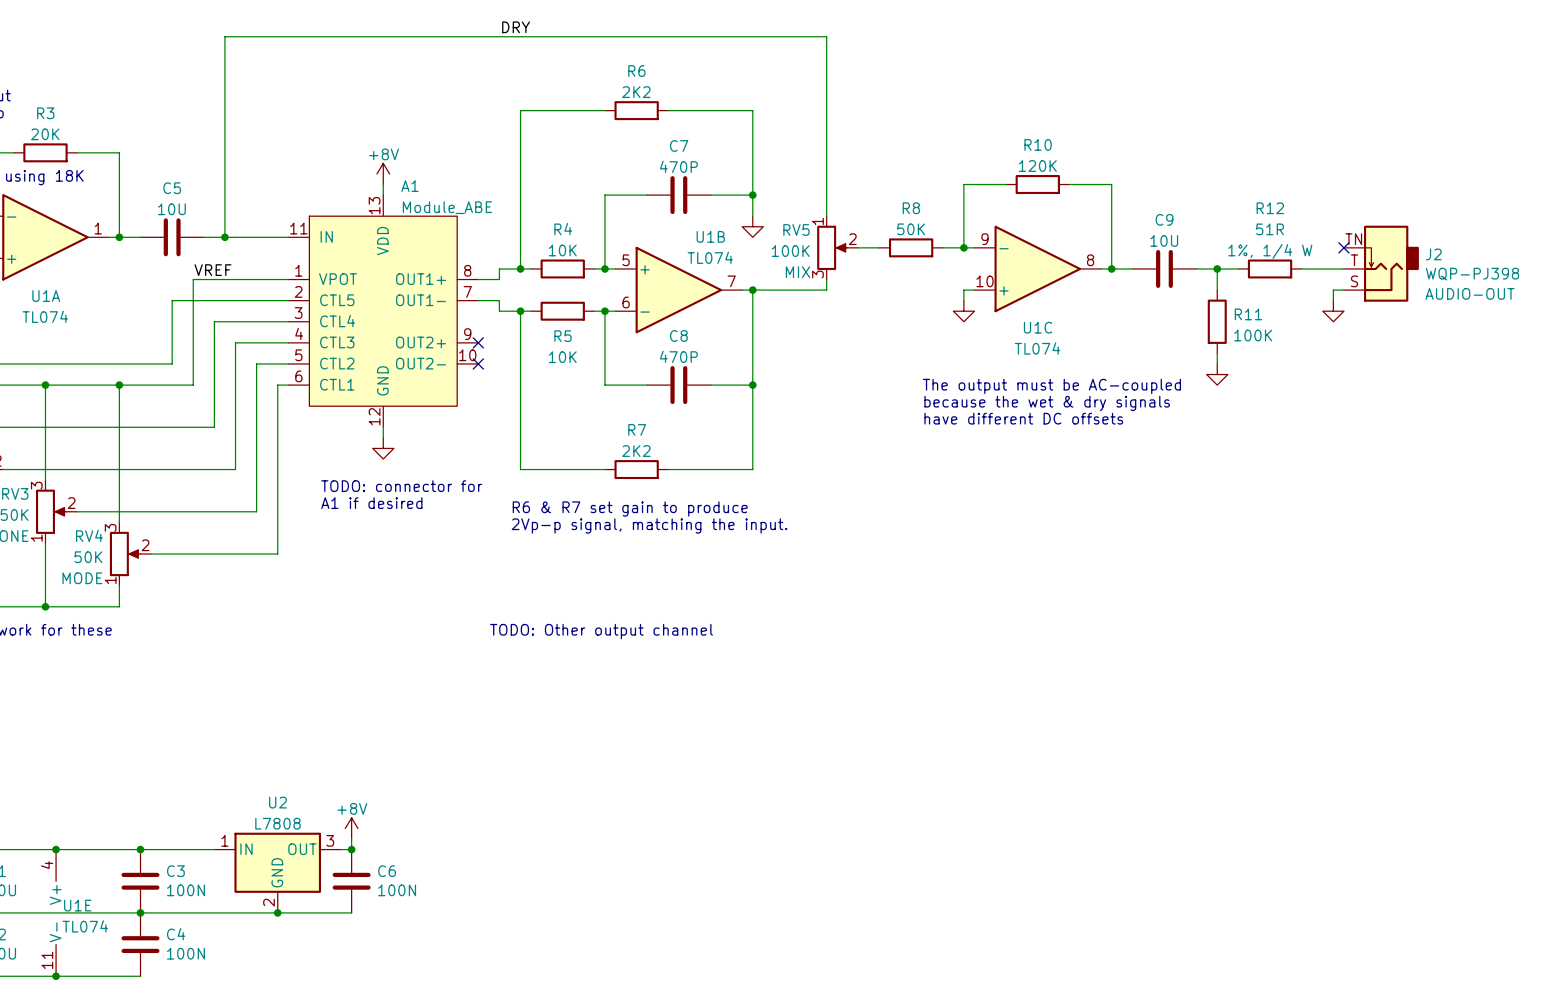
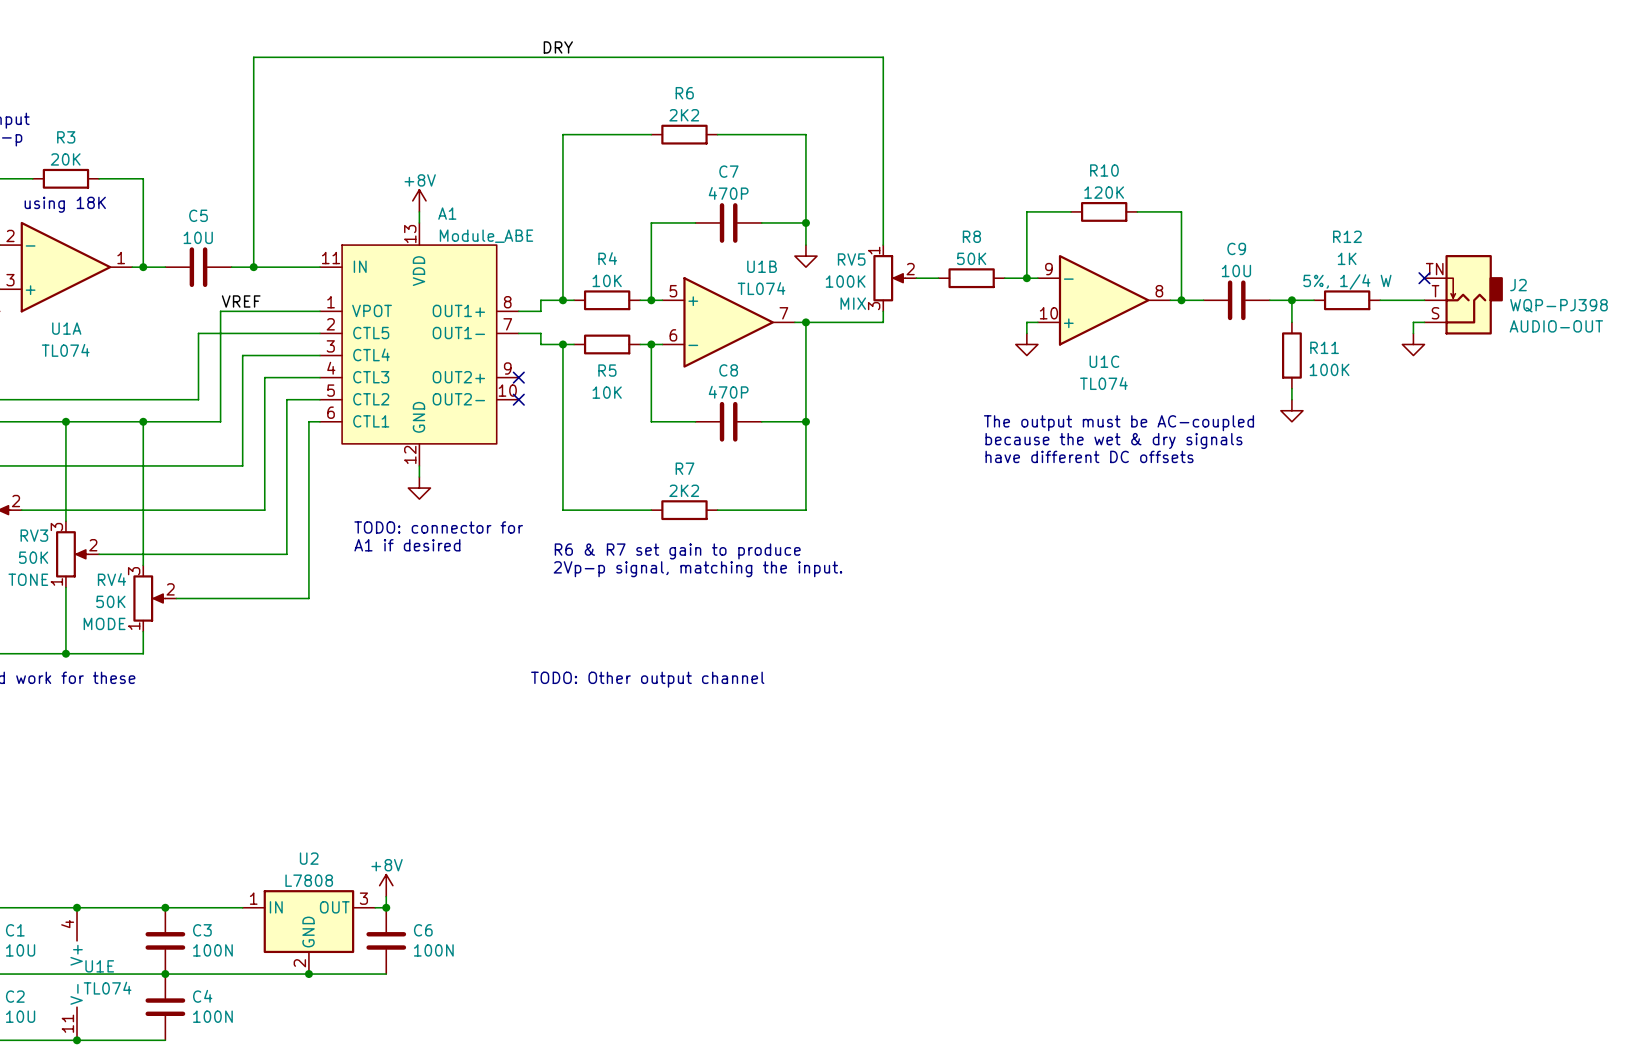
R12 value: 51R (1270, 229) -> 1K (1347, 258)
R12 text: 1%, 1/4 W (1270, 251) -> 5%, 1/4 W (1347, 281)

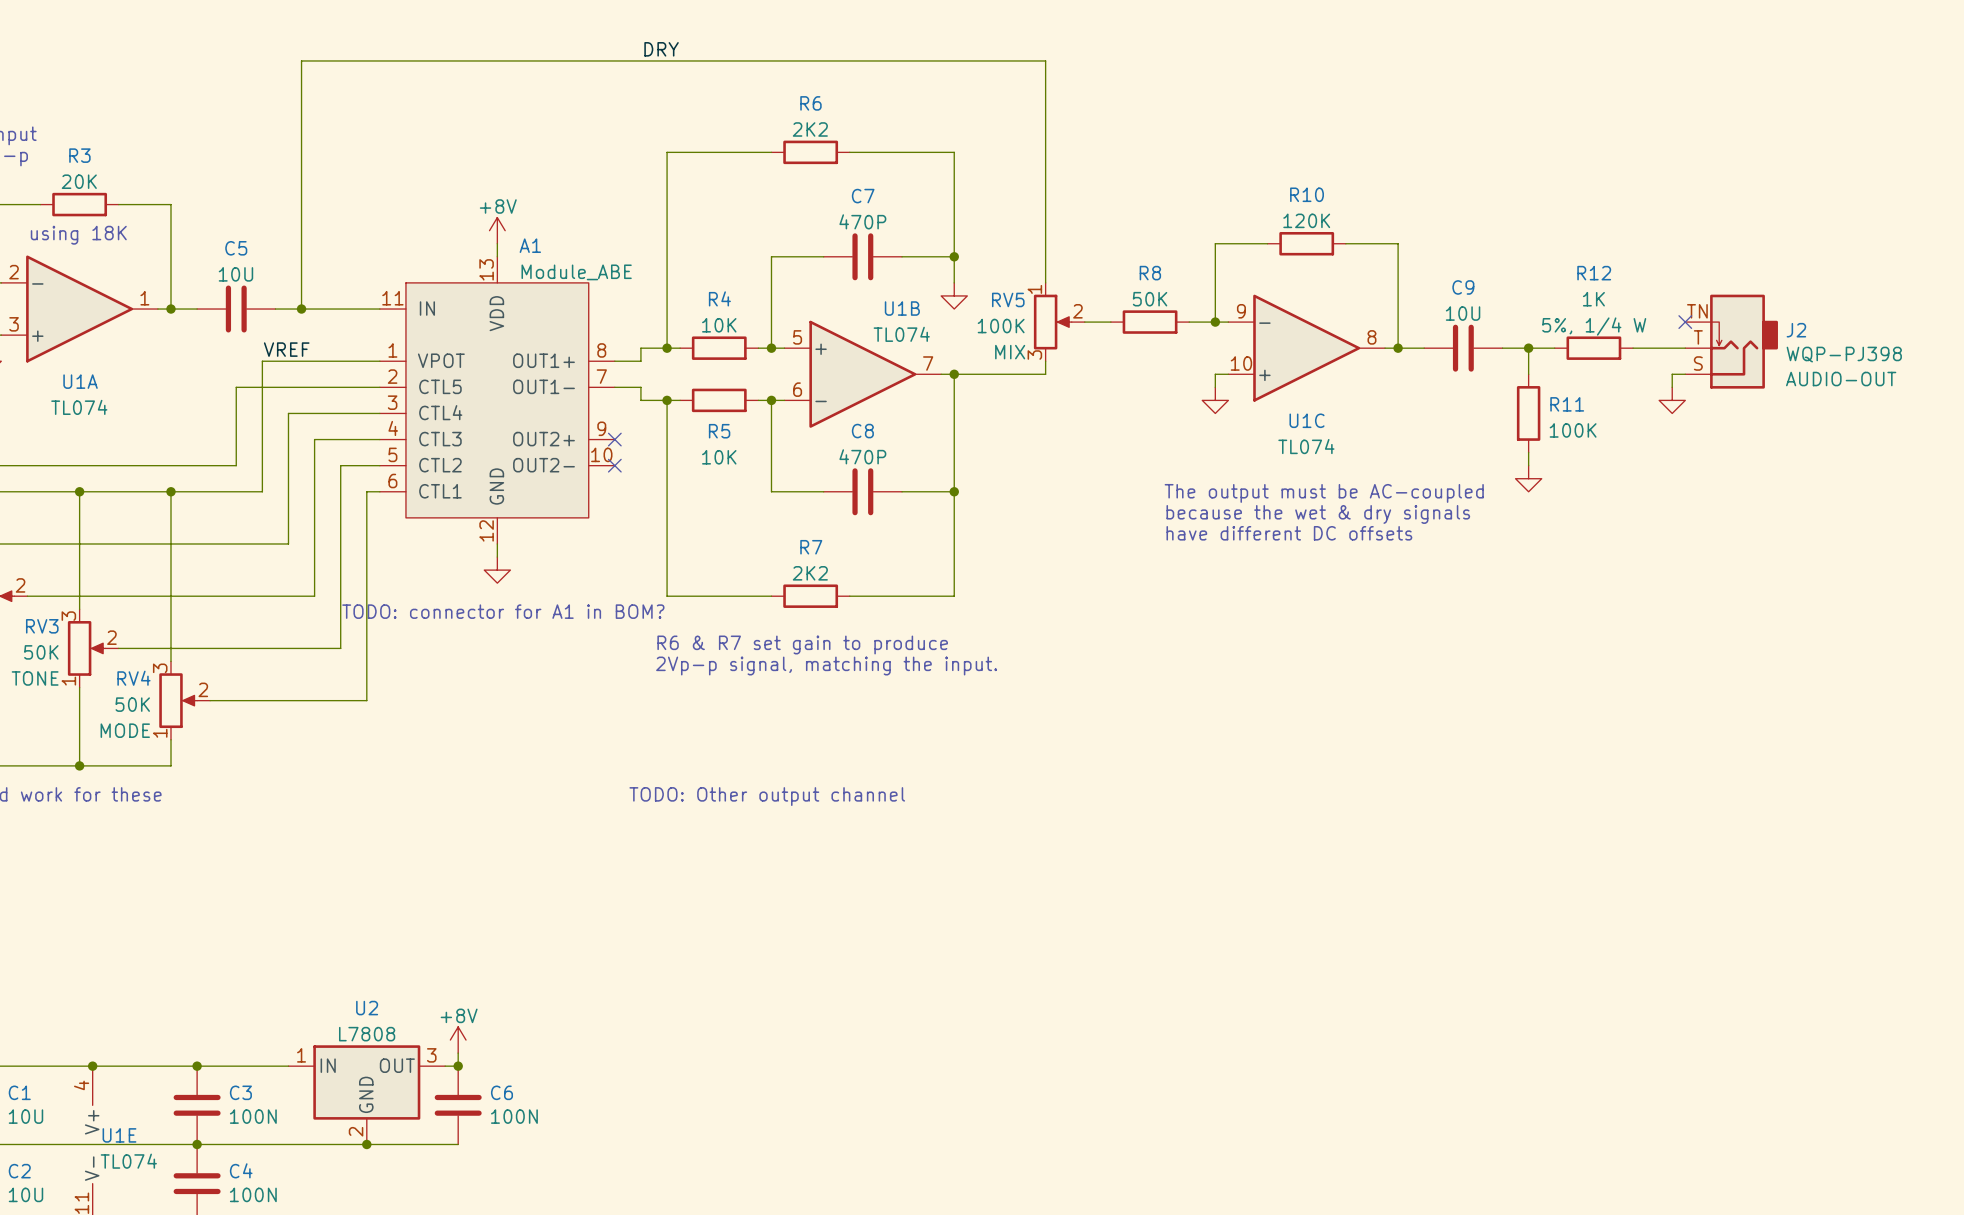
text: TODO: connector for (438, 527) -> TODO: connector for A1 in BOM? (503, 611)
text: A1 if desired (407, 545) -> none

